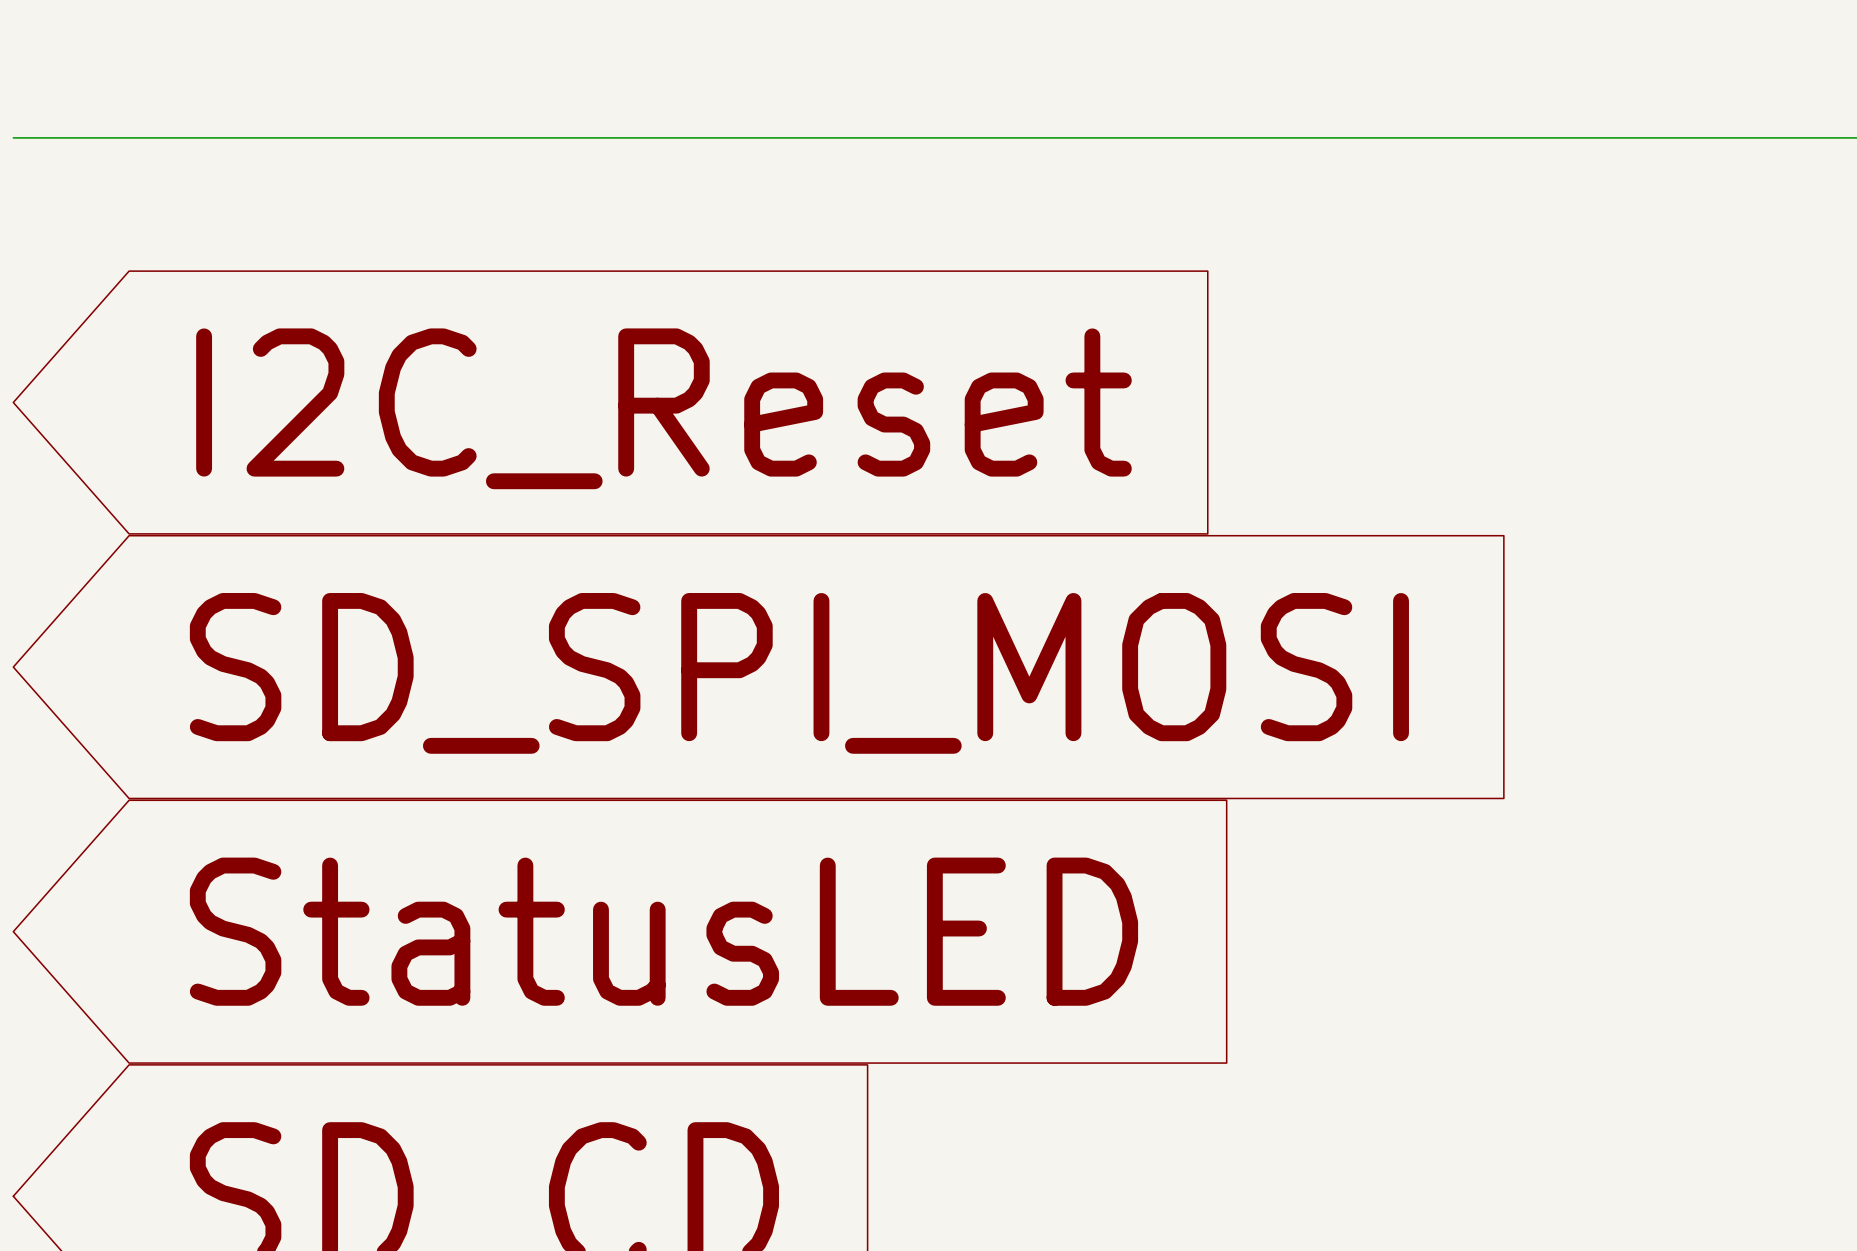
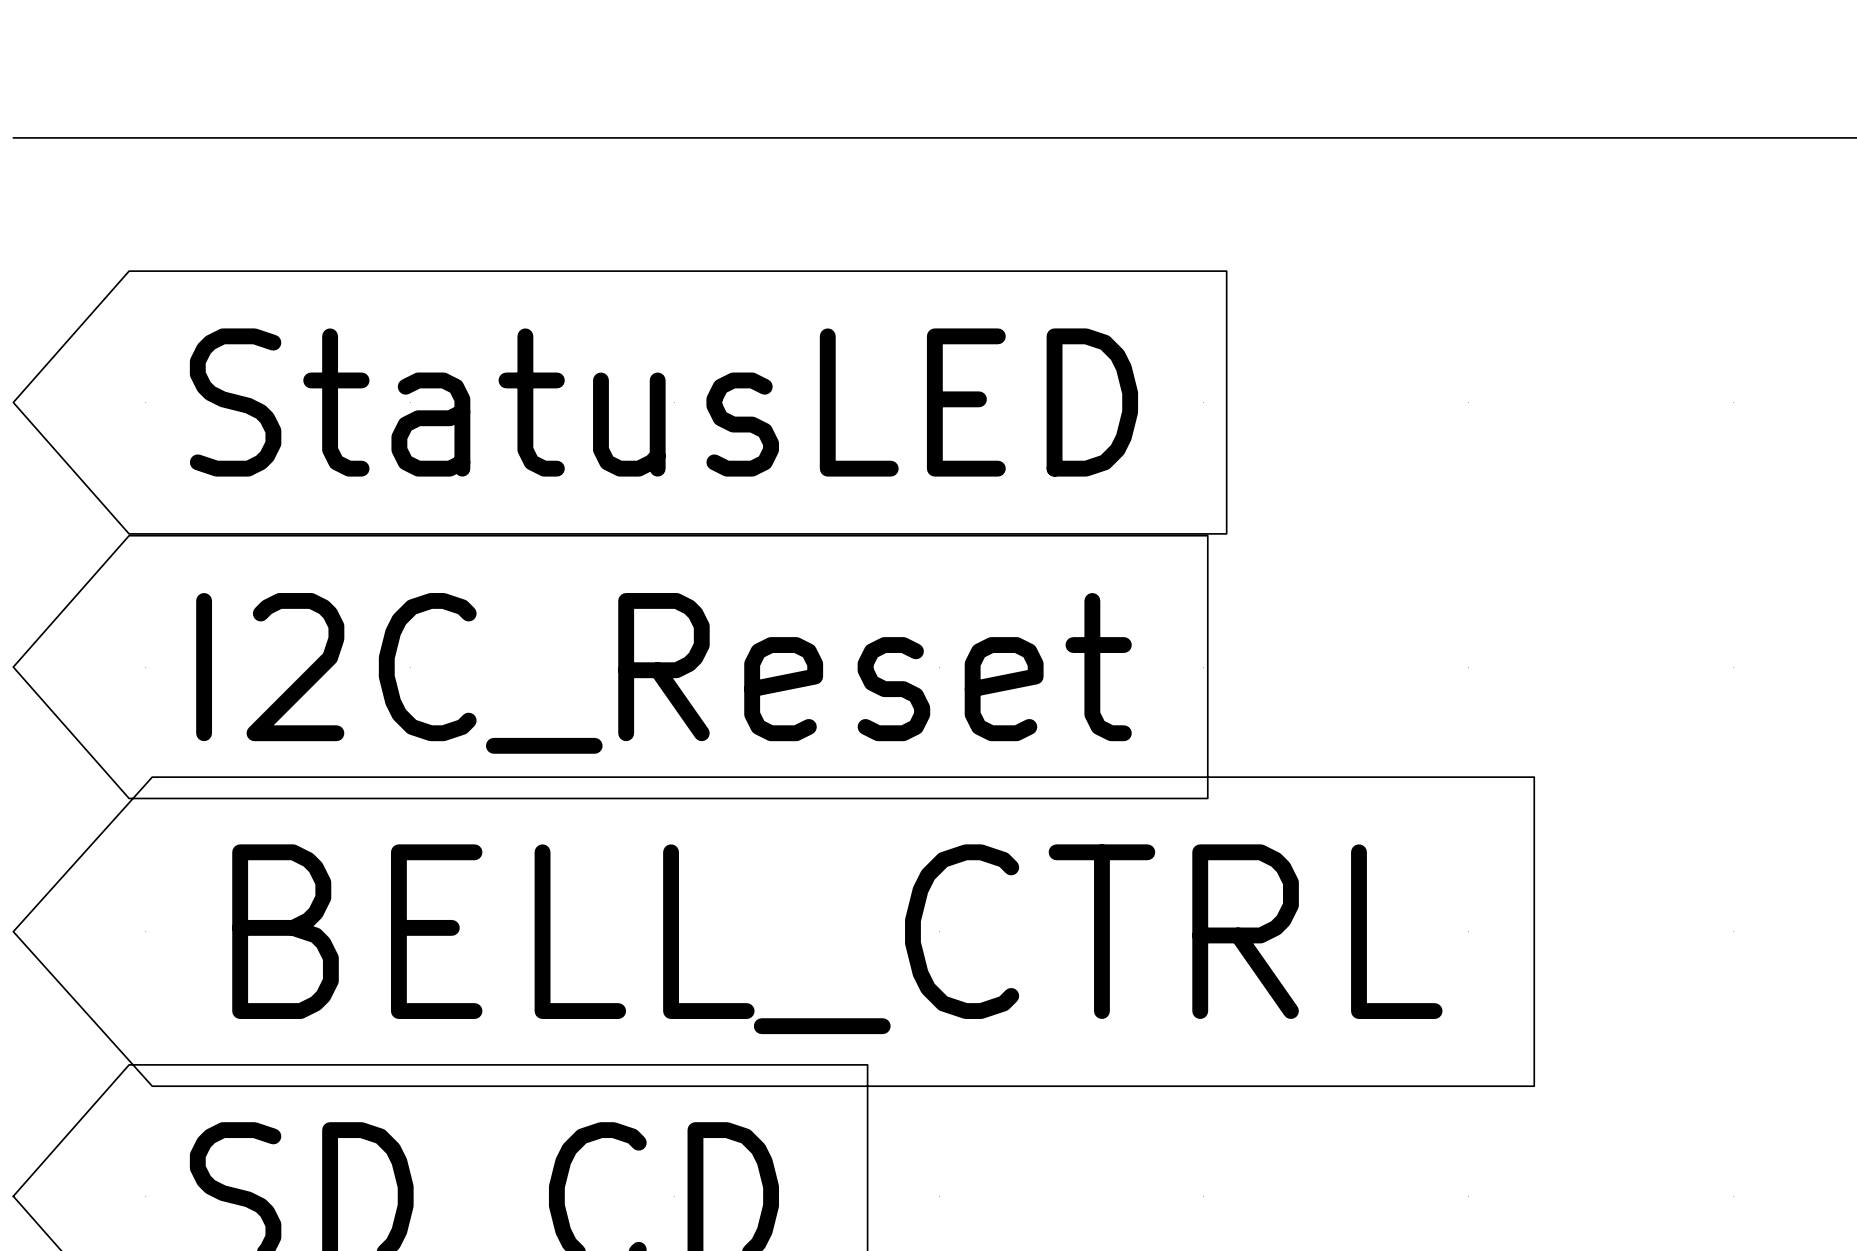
global label: I2C_Reset (663, 408) -> StatusLED (663, 402)
global label: SD_SPI_MOSI (799, 673) -> I2C_Reset (663, 673)
global label: StatusLED (663, 931) -> BELL_CTRL (837, 939)

